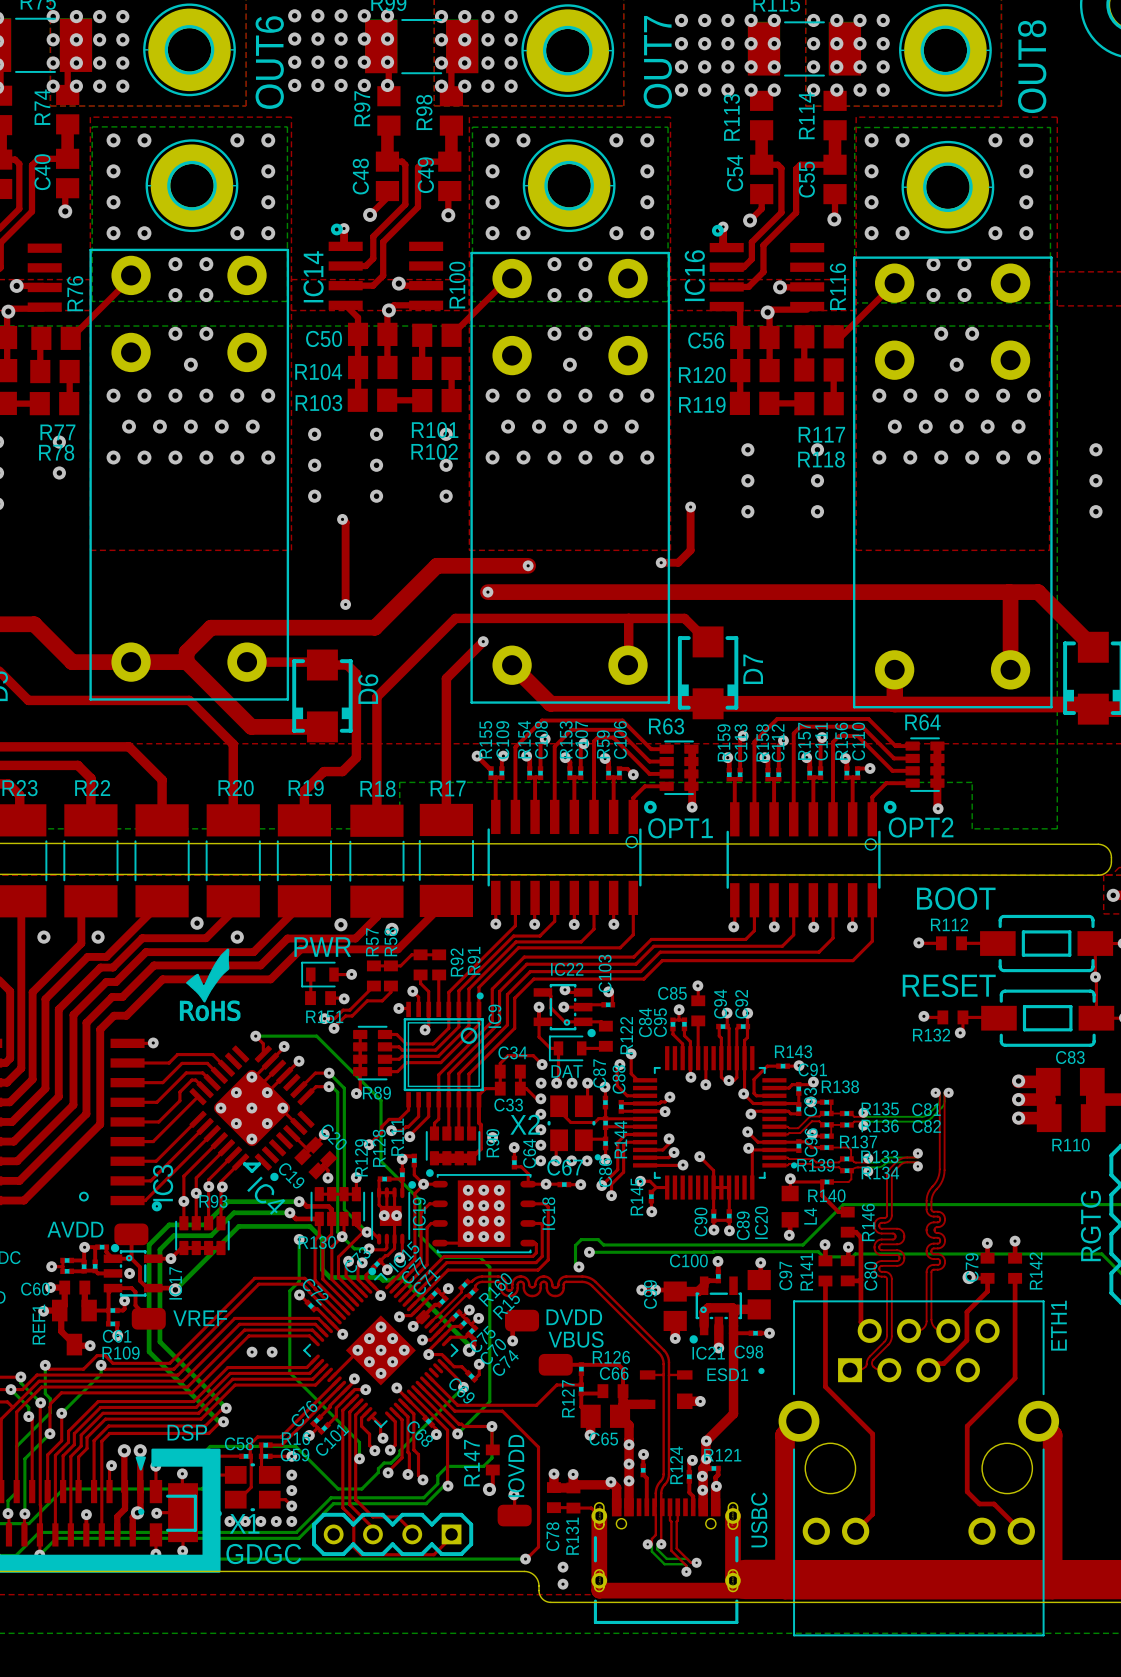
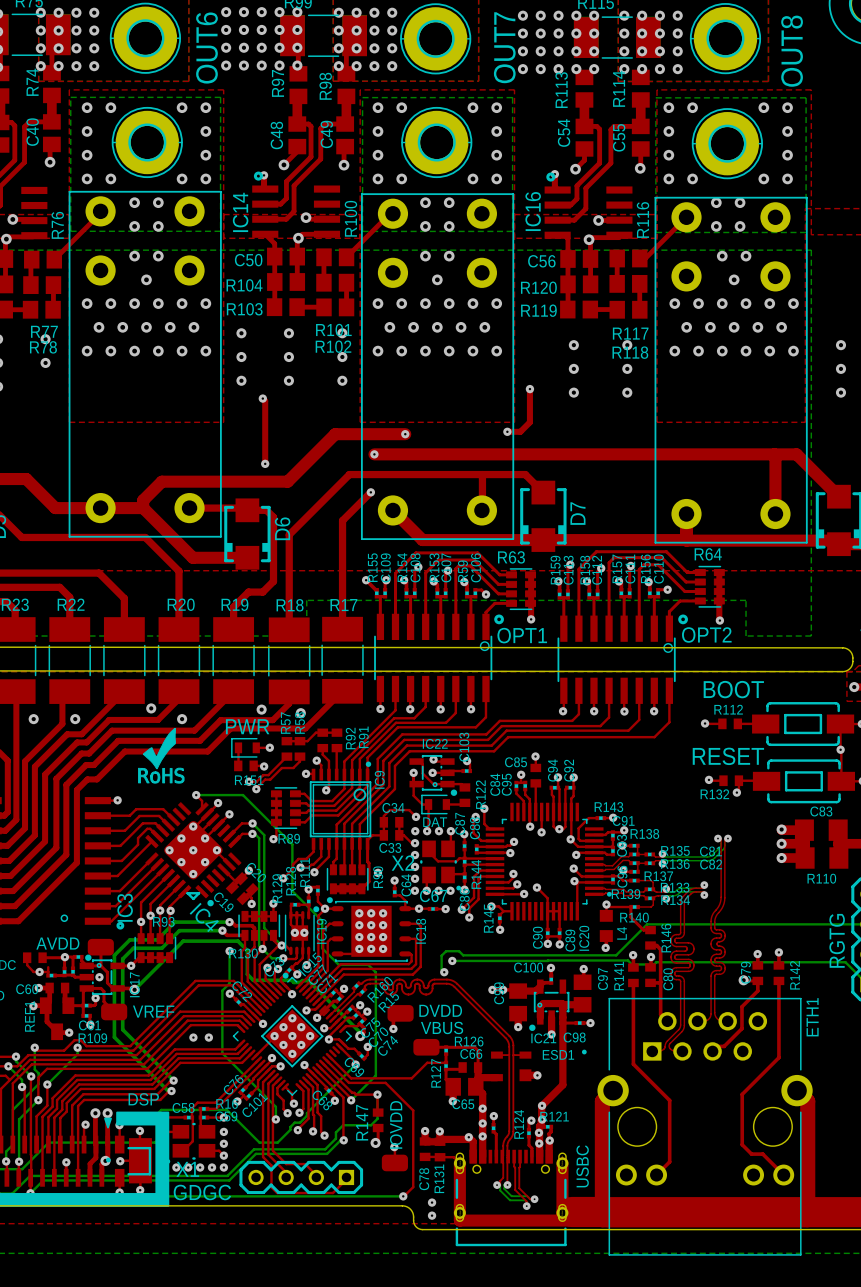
top track: none -> (27, 957) (27, 965) (33, 971) (39, 971)
part: none -> (34, 957)
top track: none -> (42, 957) (64, 957)
part: (67, 1260) -> none
top track: (71, 1260) (84, 1260) -> none
IC15 footprint: [303, 1267, 459, 1428] -> [232, 972, 352, 1096]

